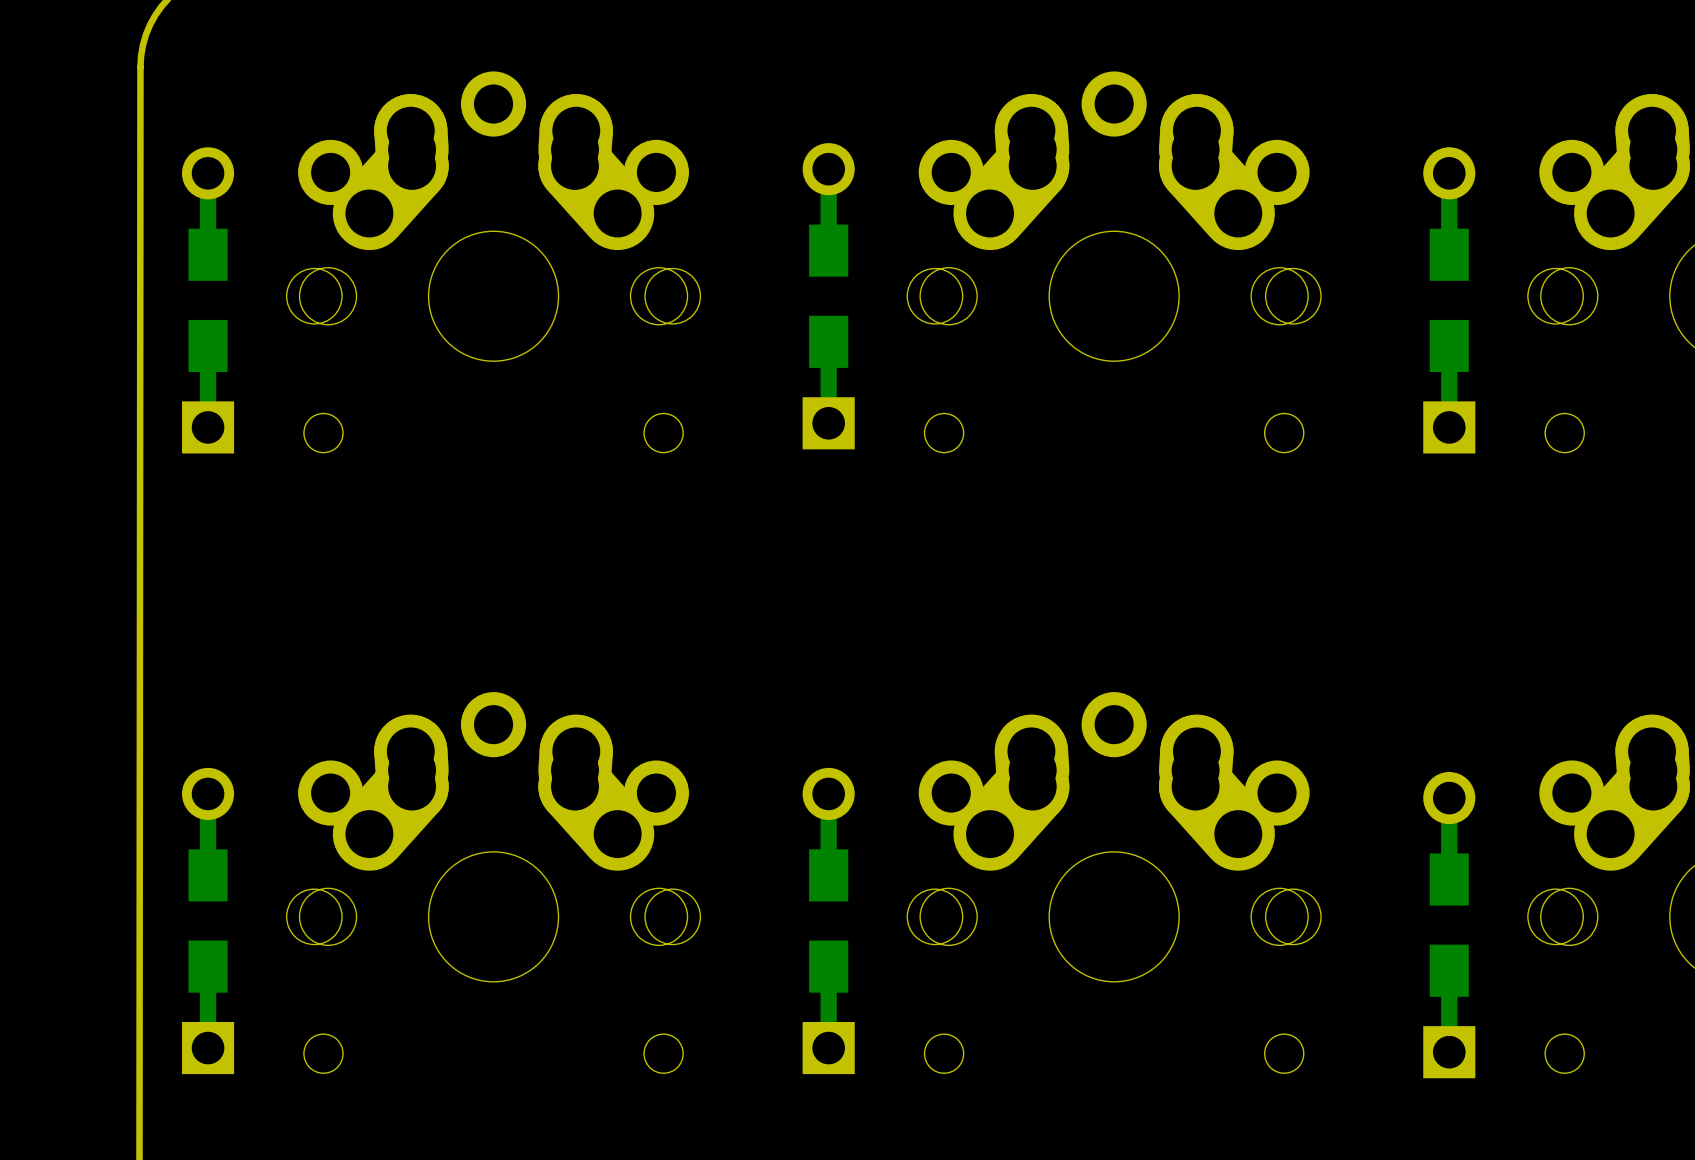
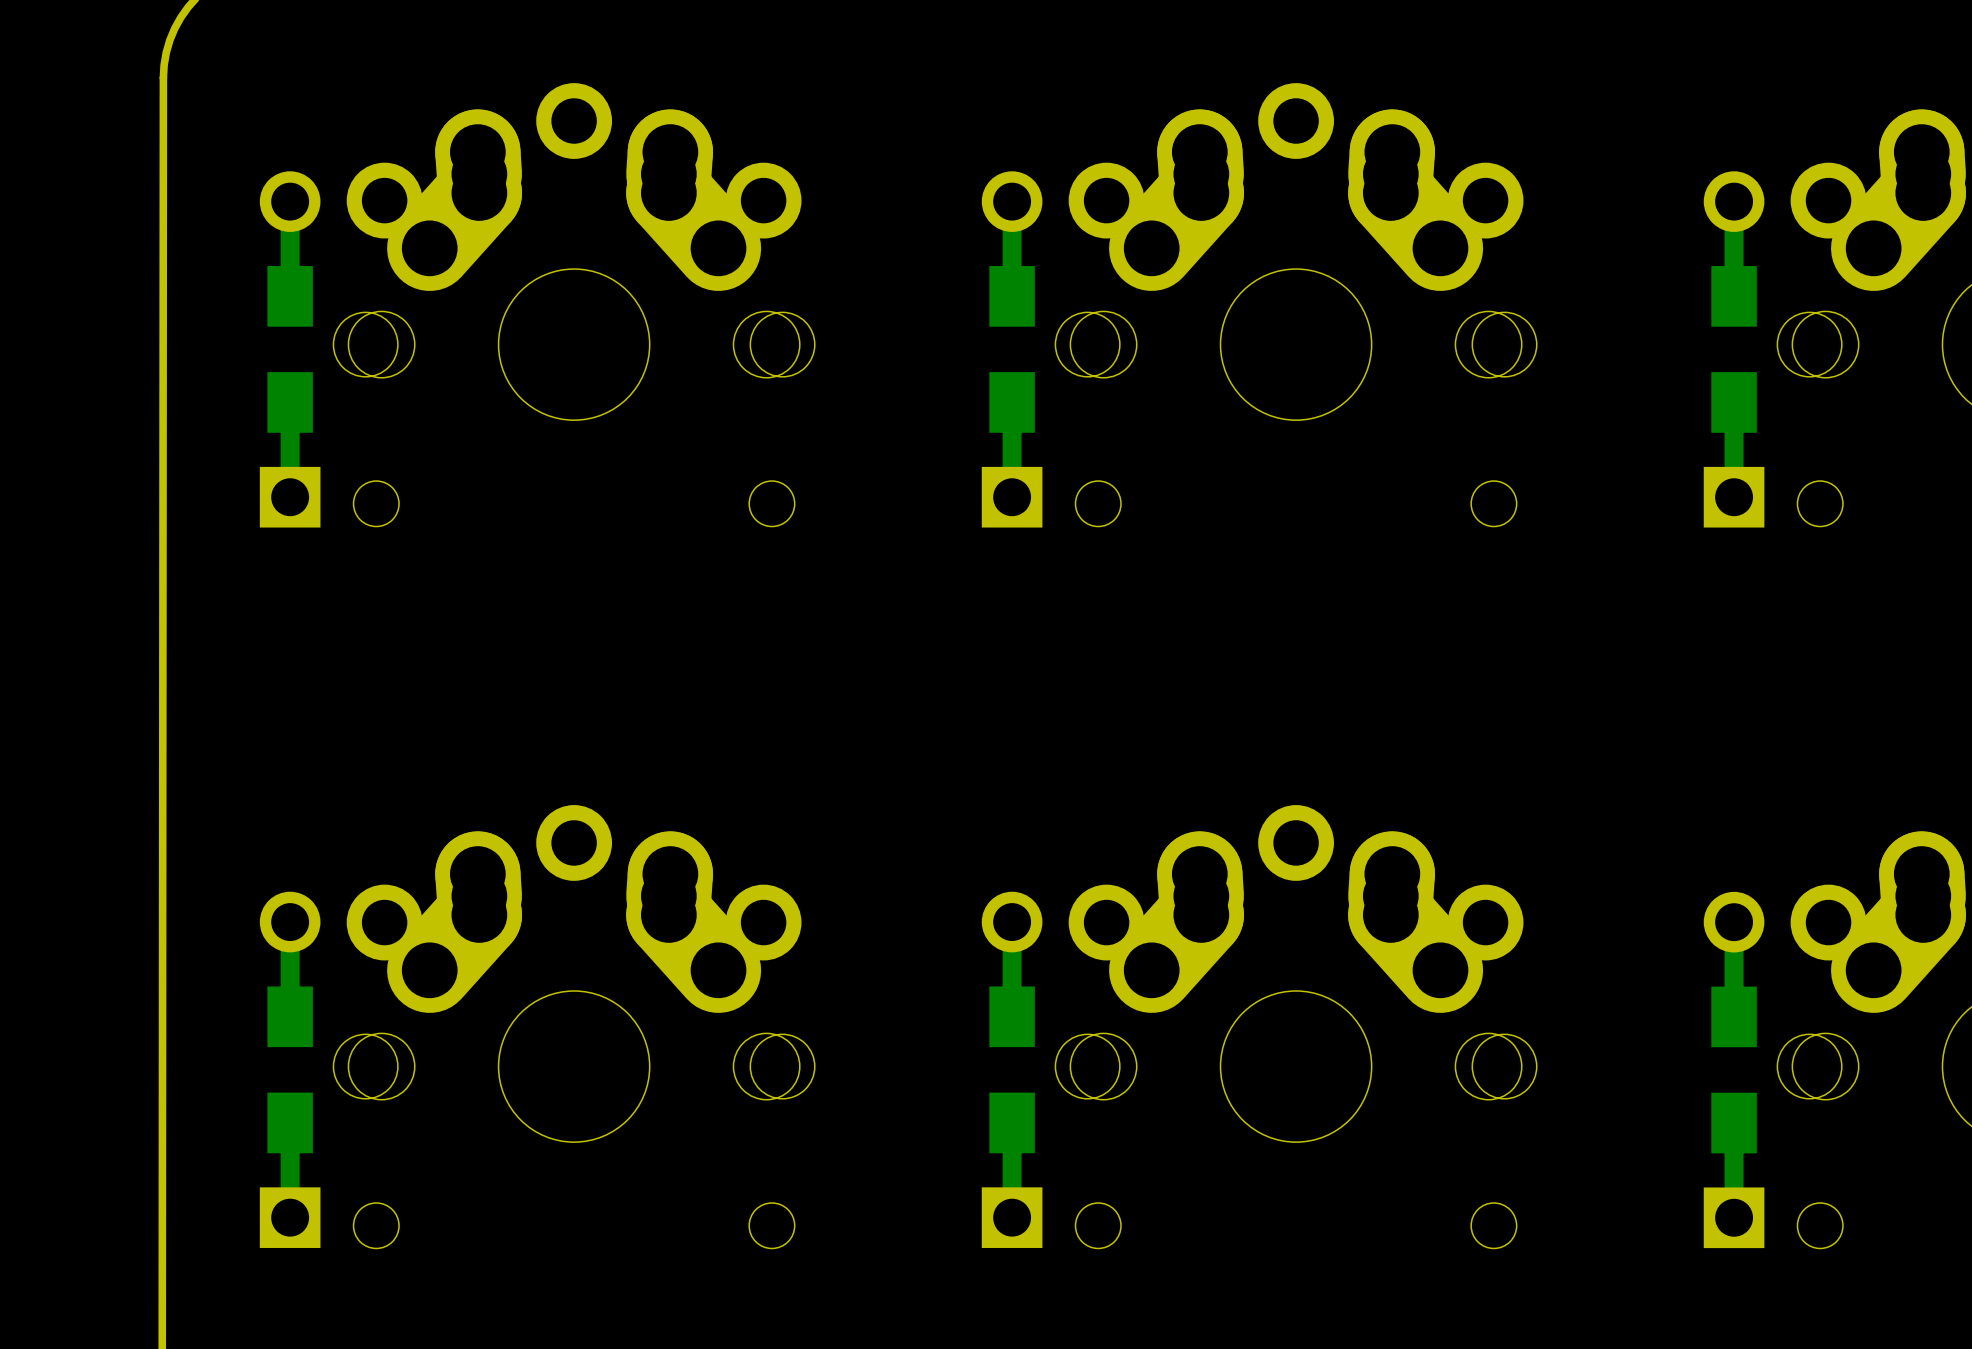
part position: (828, 296) -> (1012, 349)
part position: (208, 300) -> (290, 349)
part position: (1449, 300) -> (1734, 349)
part position: (208, 920) -> (290, 1069)
part position: (828, 920) -> (1012, 1069)
part position: (1449, 925) -> (1734, 1069)

